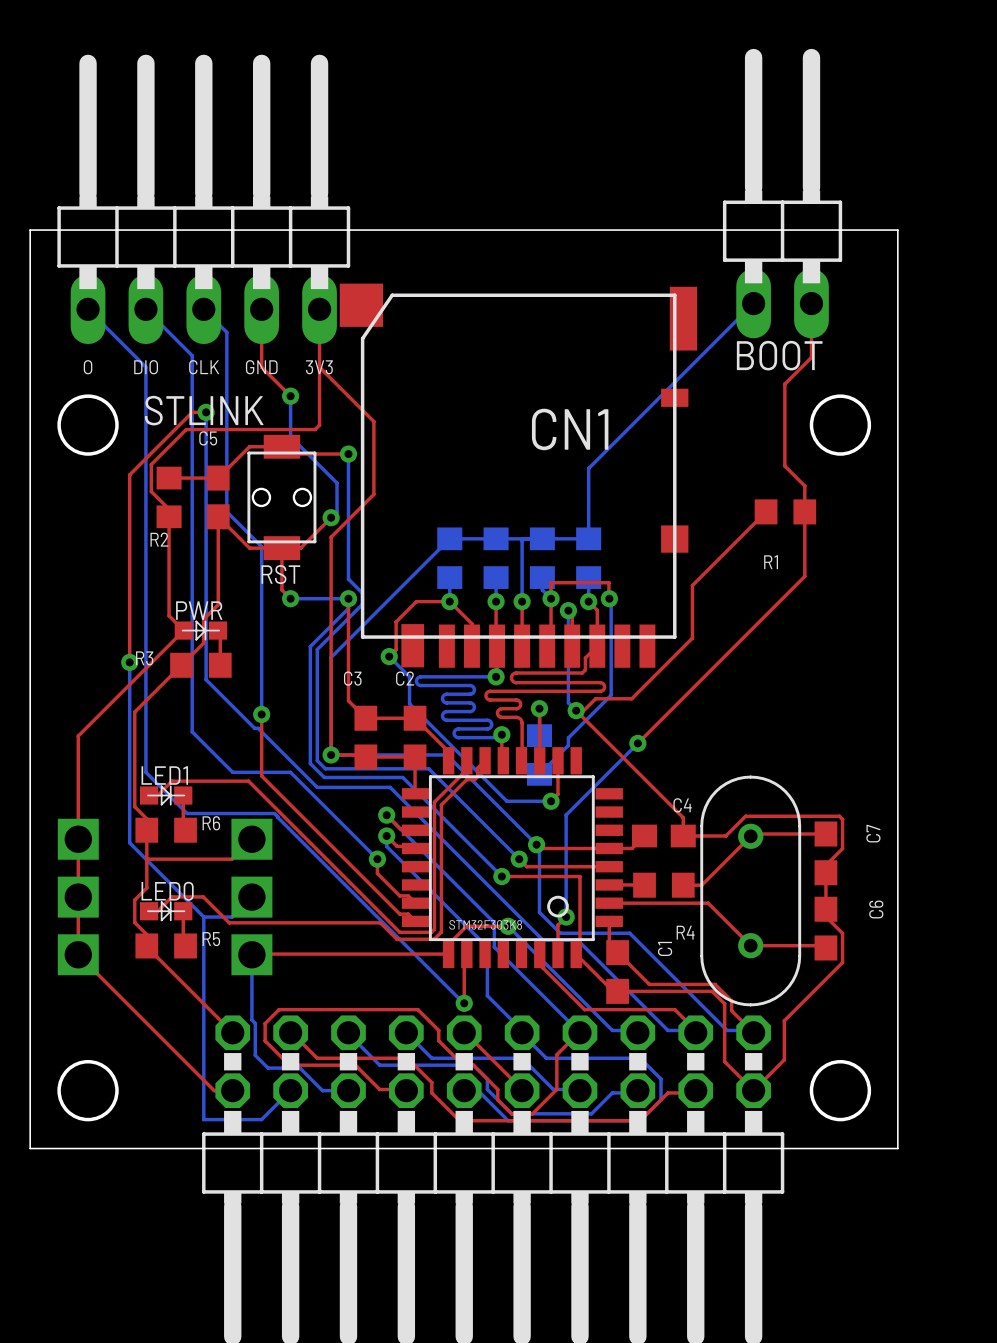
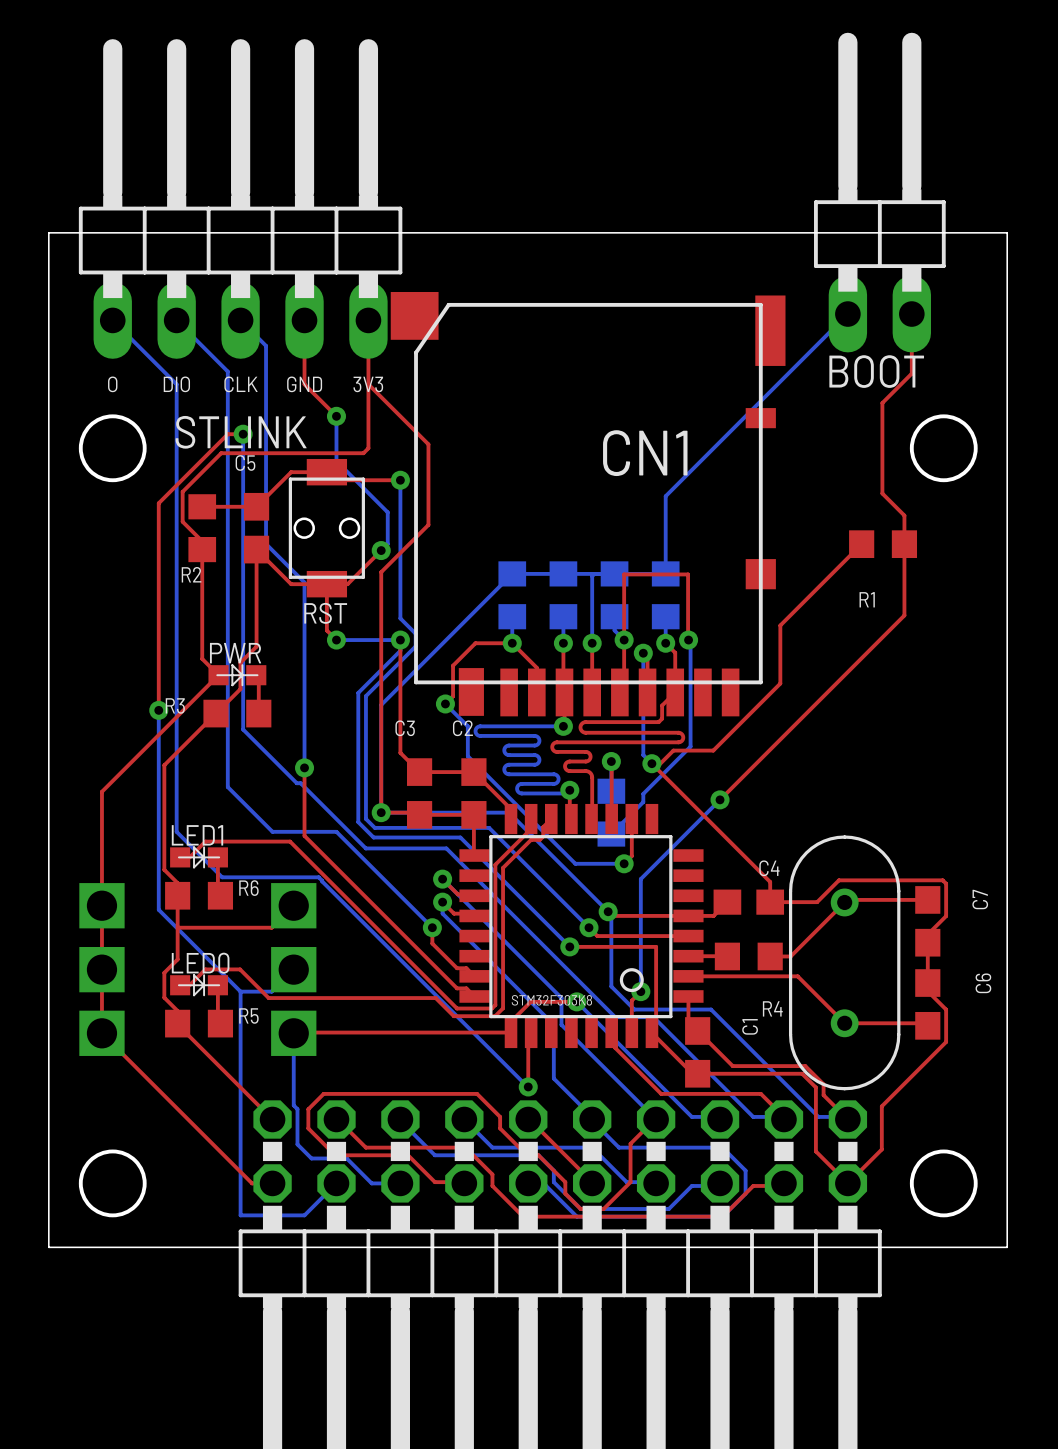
top track: (551, 582) (608, 582) -> (624, 622) (624, 574) (688, 574) (688, 622)

